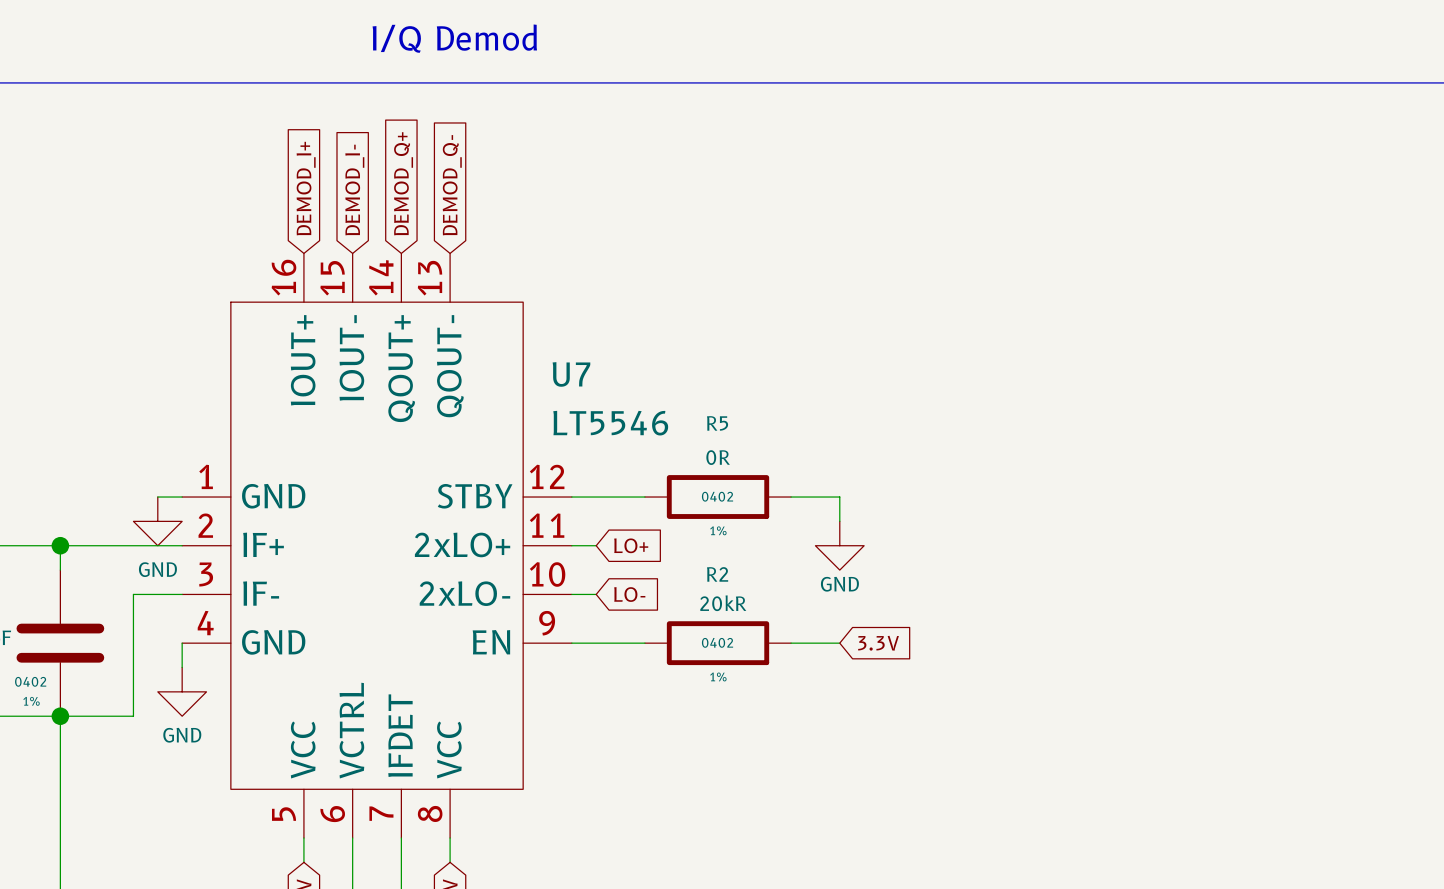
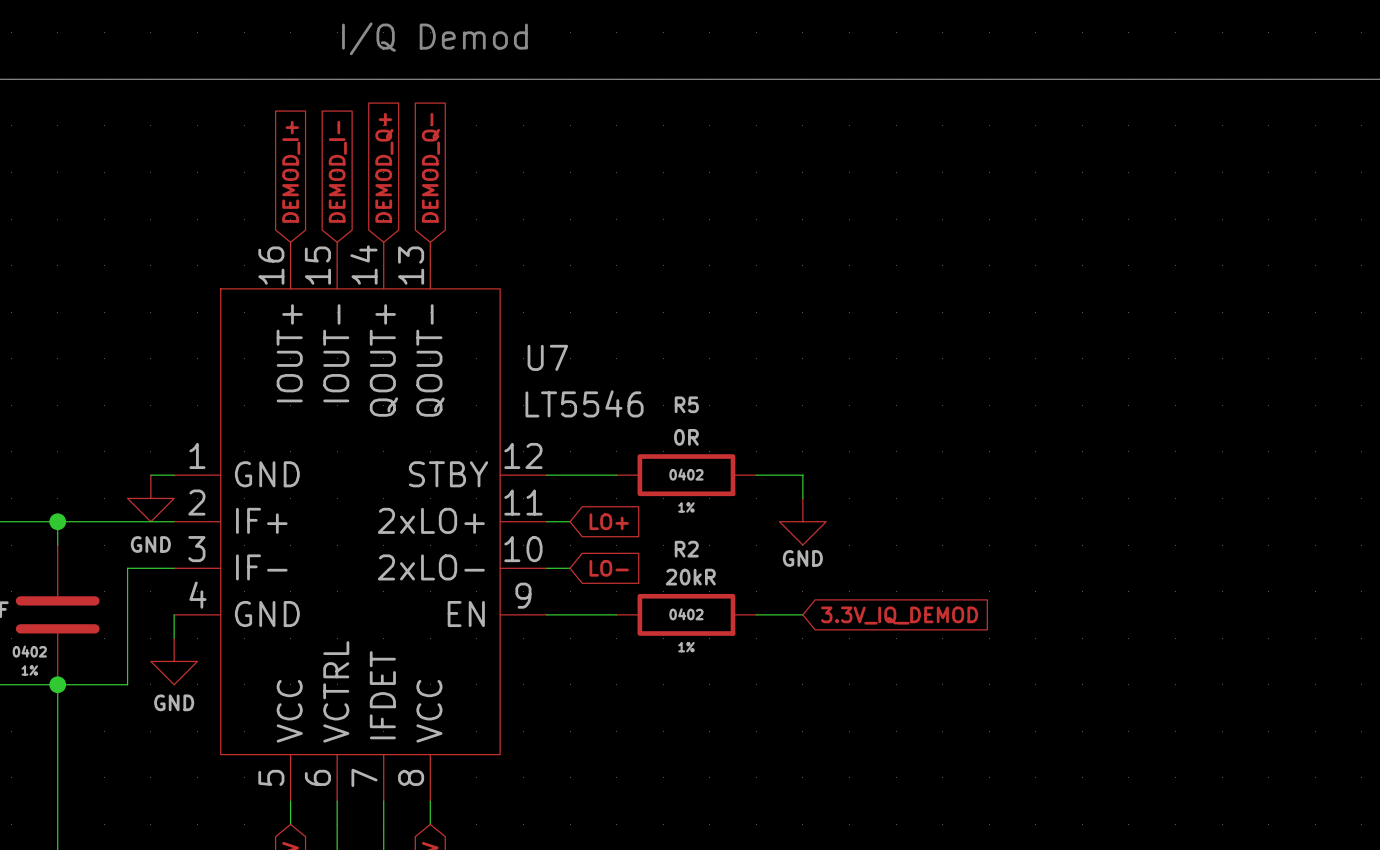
global label: 3.3V (878, 643) -> 3.3V_IQ_DEMOD (899, 615)

